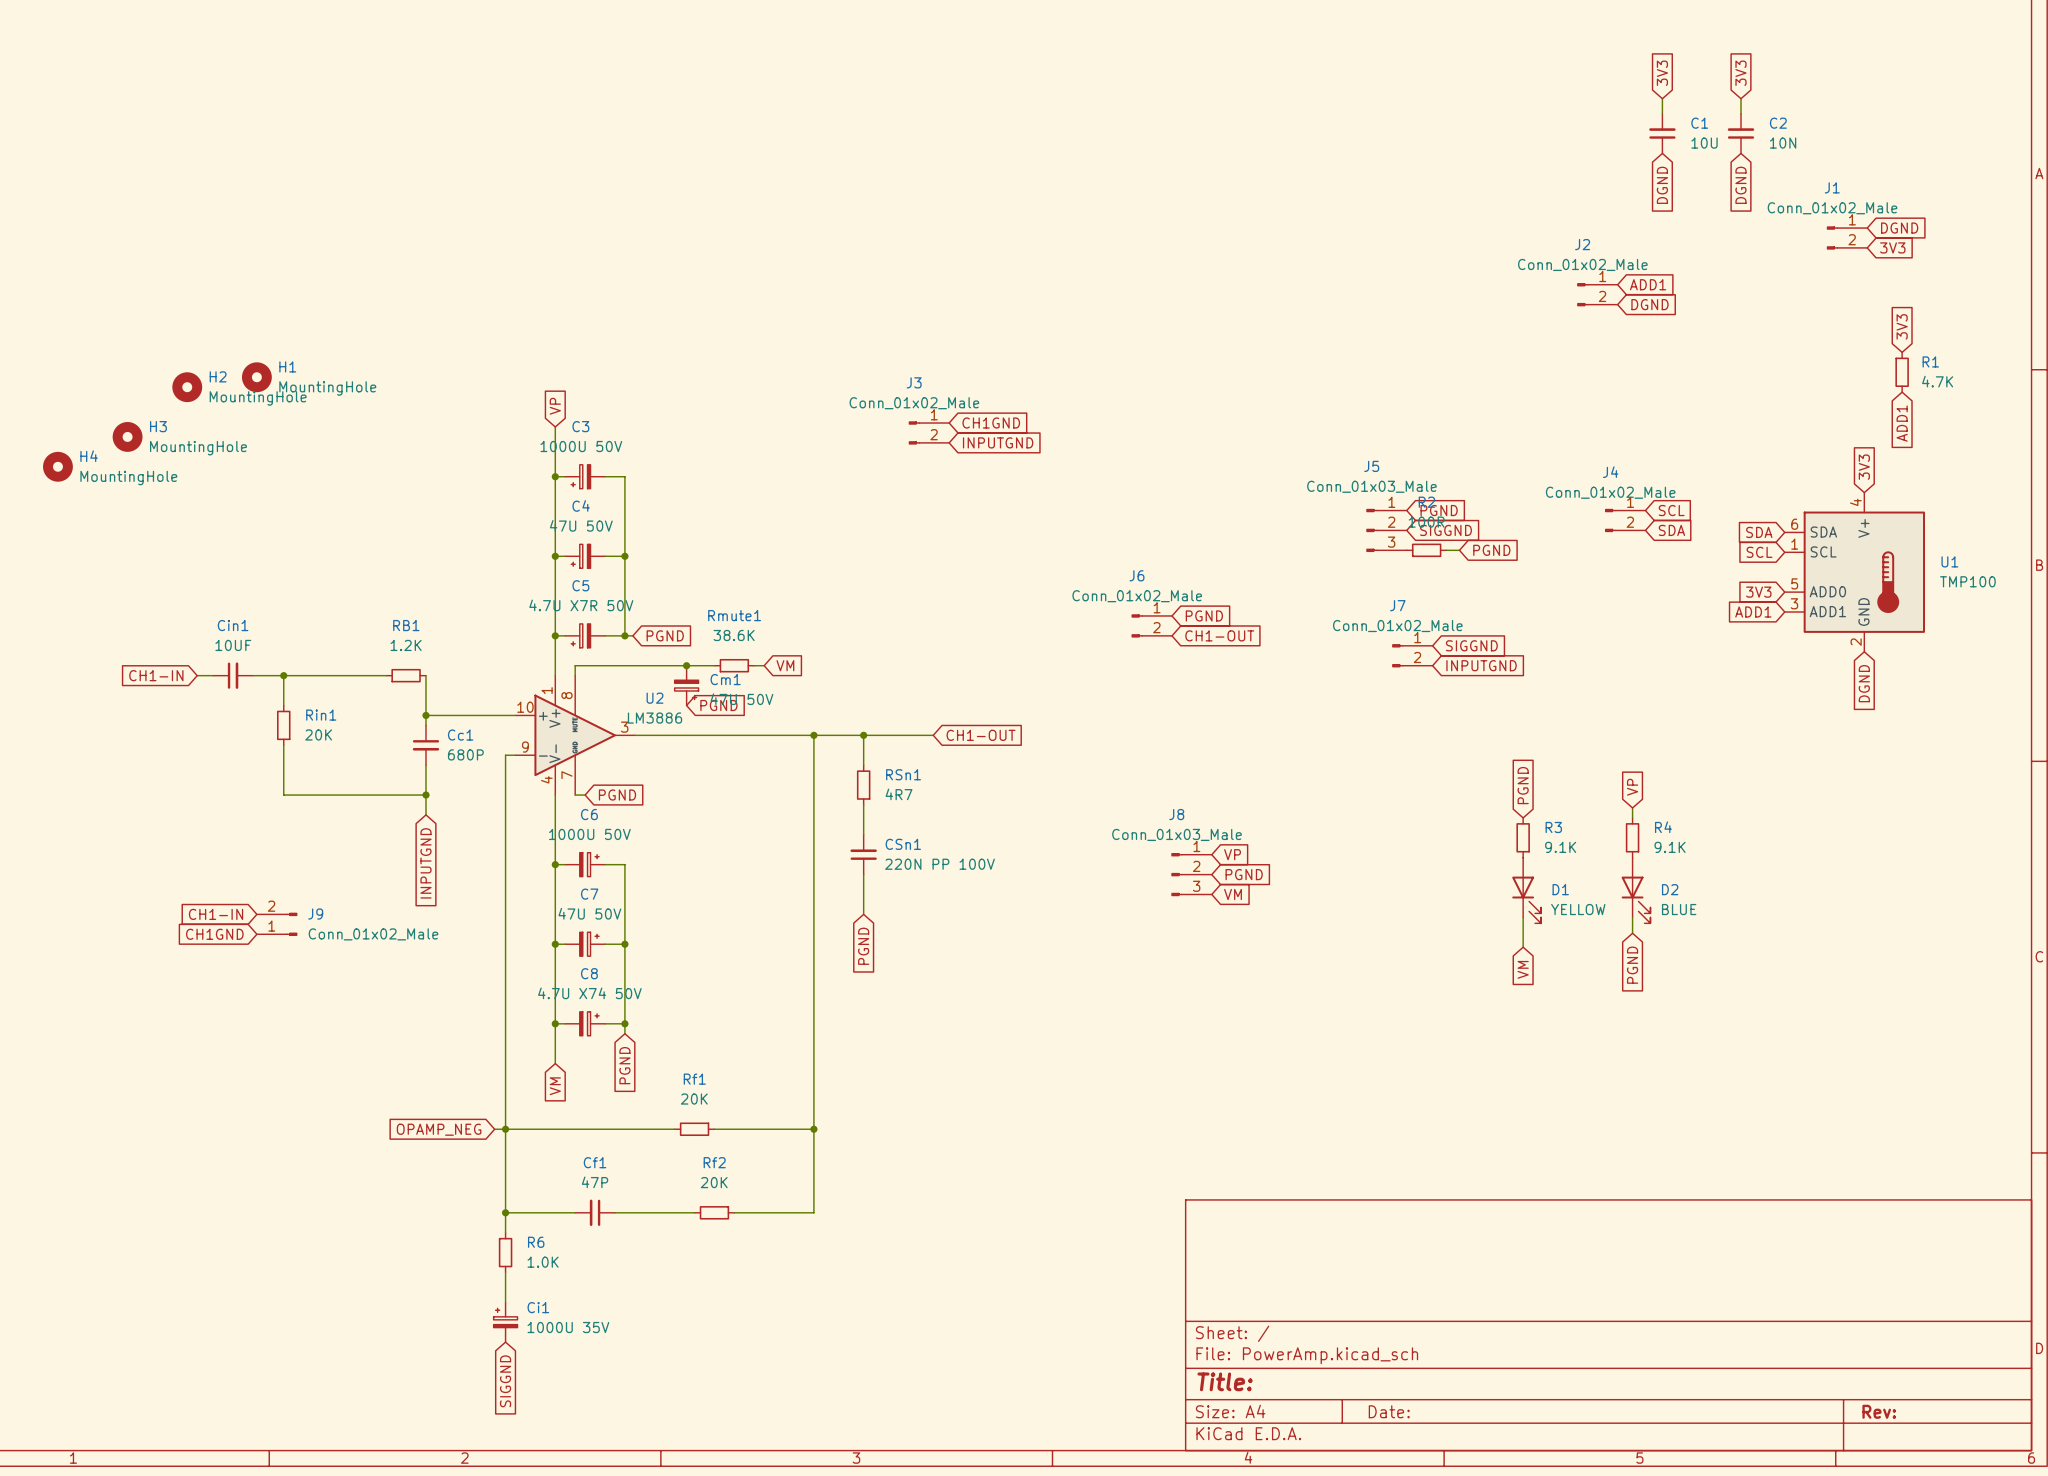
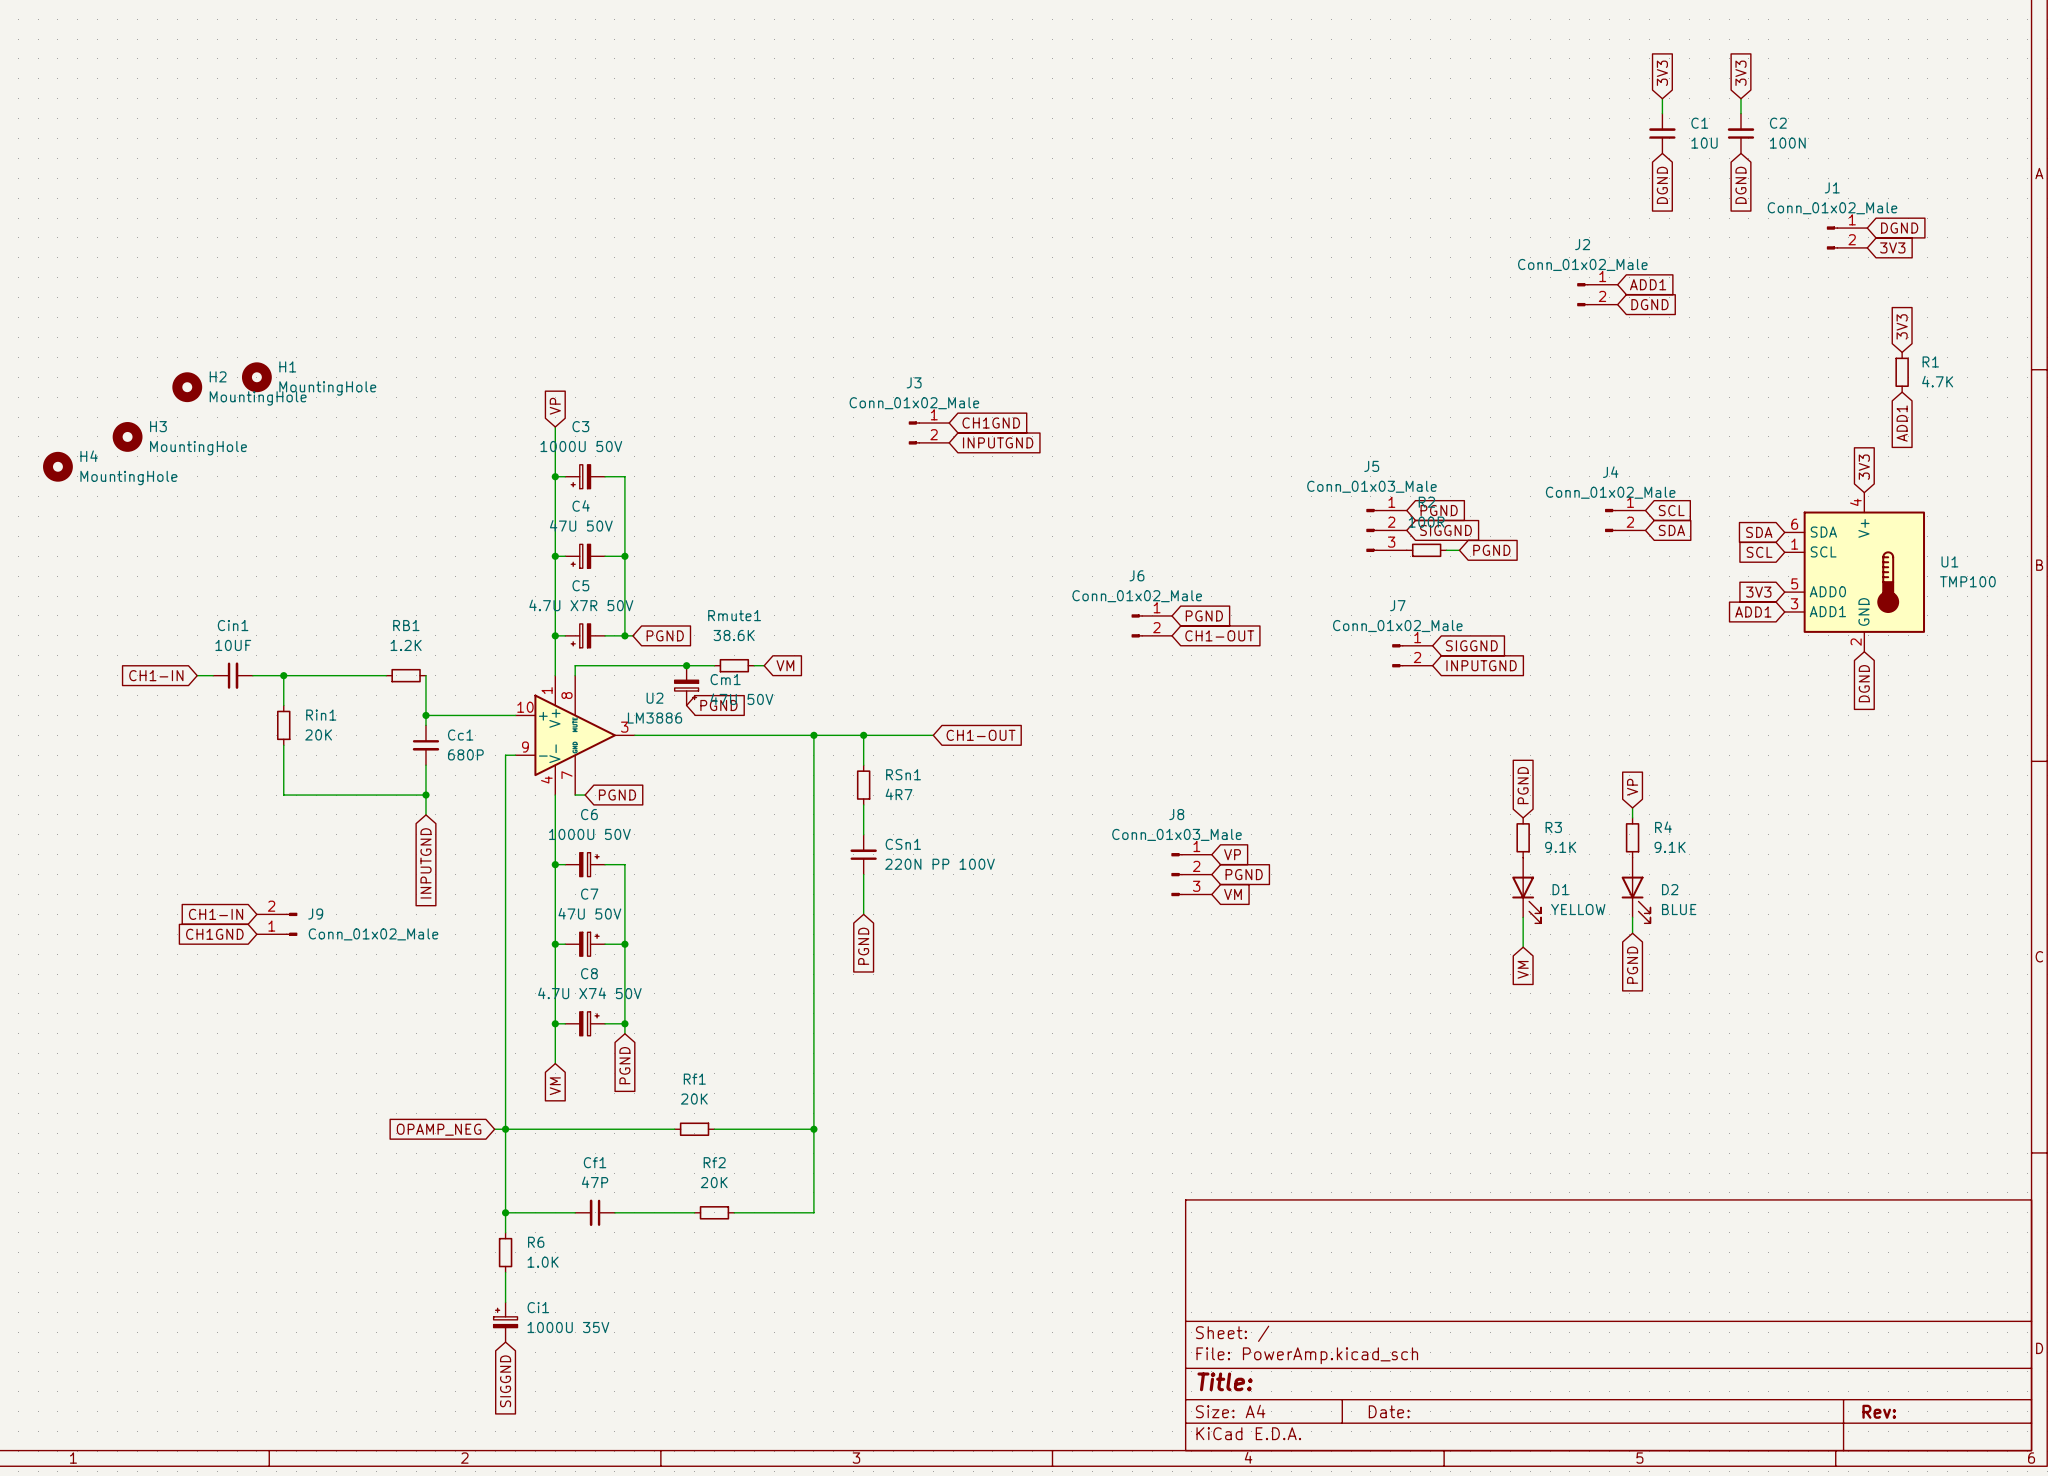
C2 value: 10N (1783, 143) -> 100N (1787, 143)

